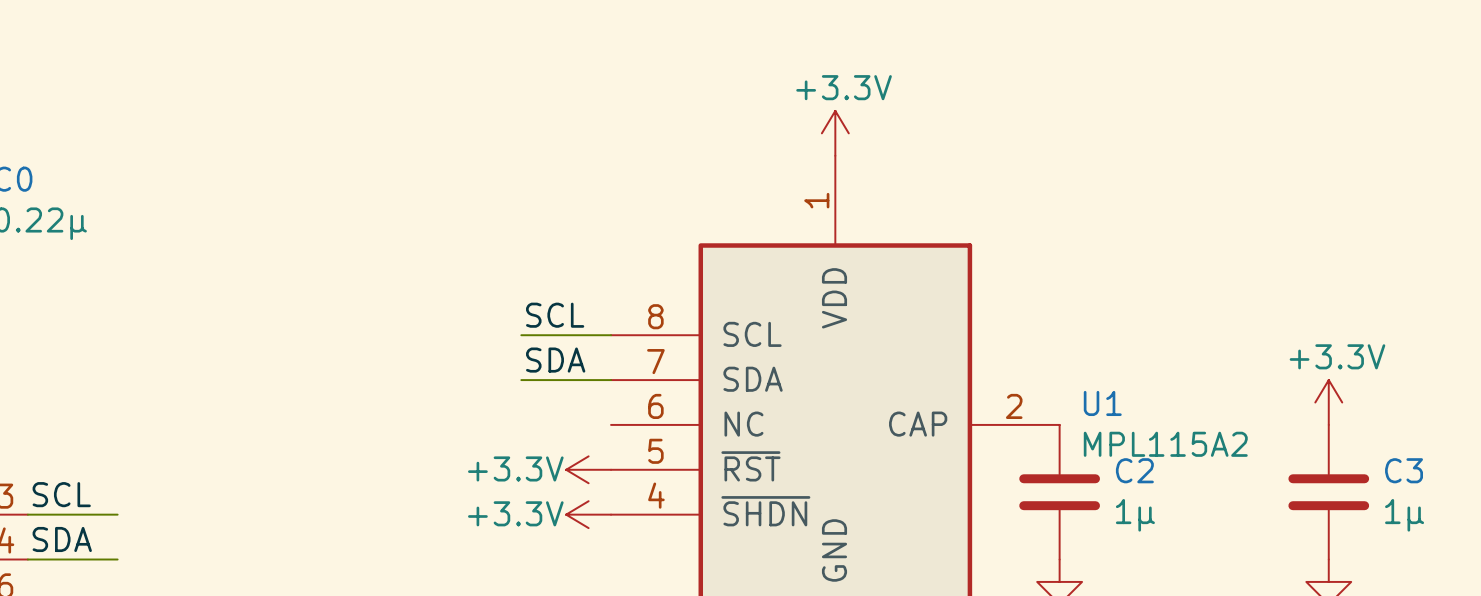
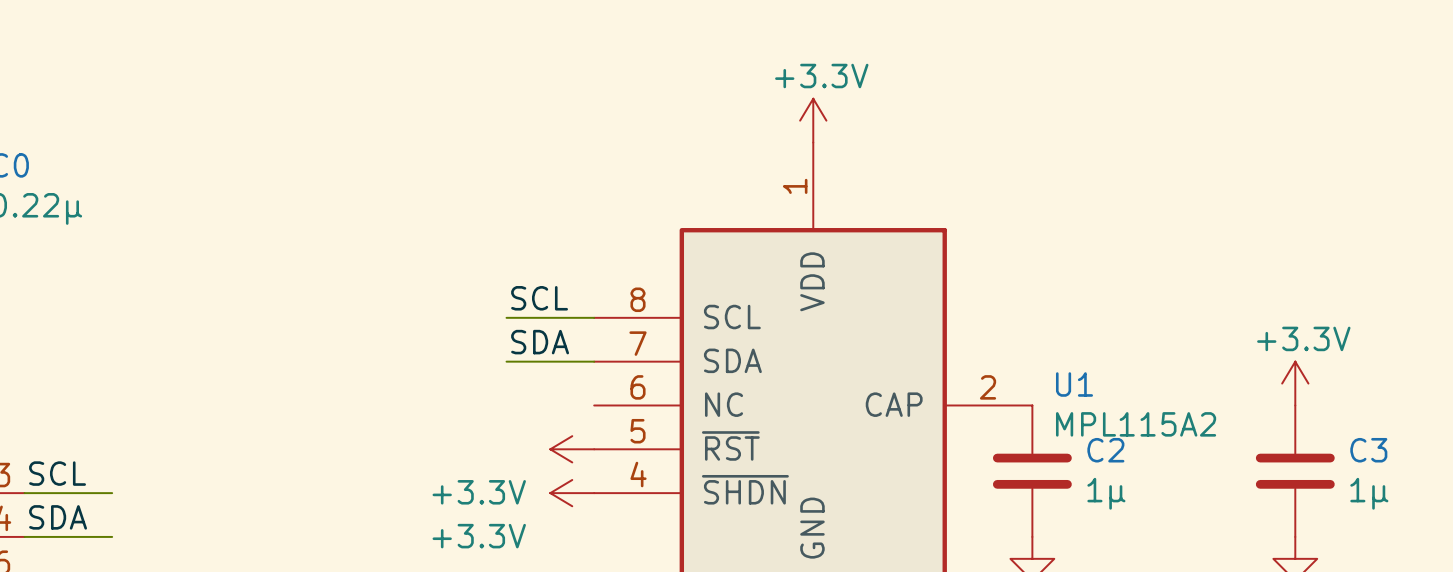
power symbol text position: +3.3V (515, 468) -> +3.3V (479, 492)
power symbol text position: +3.3V (515, 513) -> +3.3V (479, 536)

